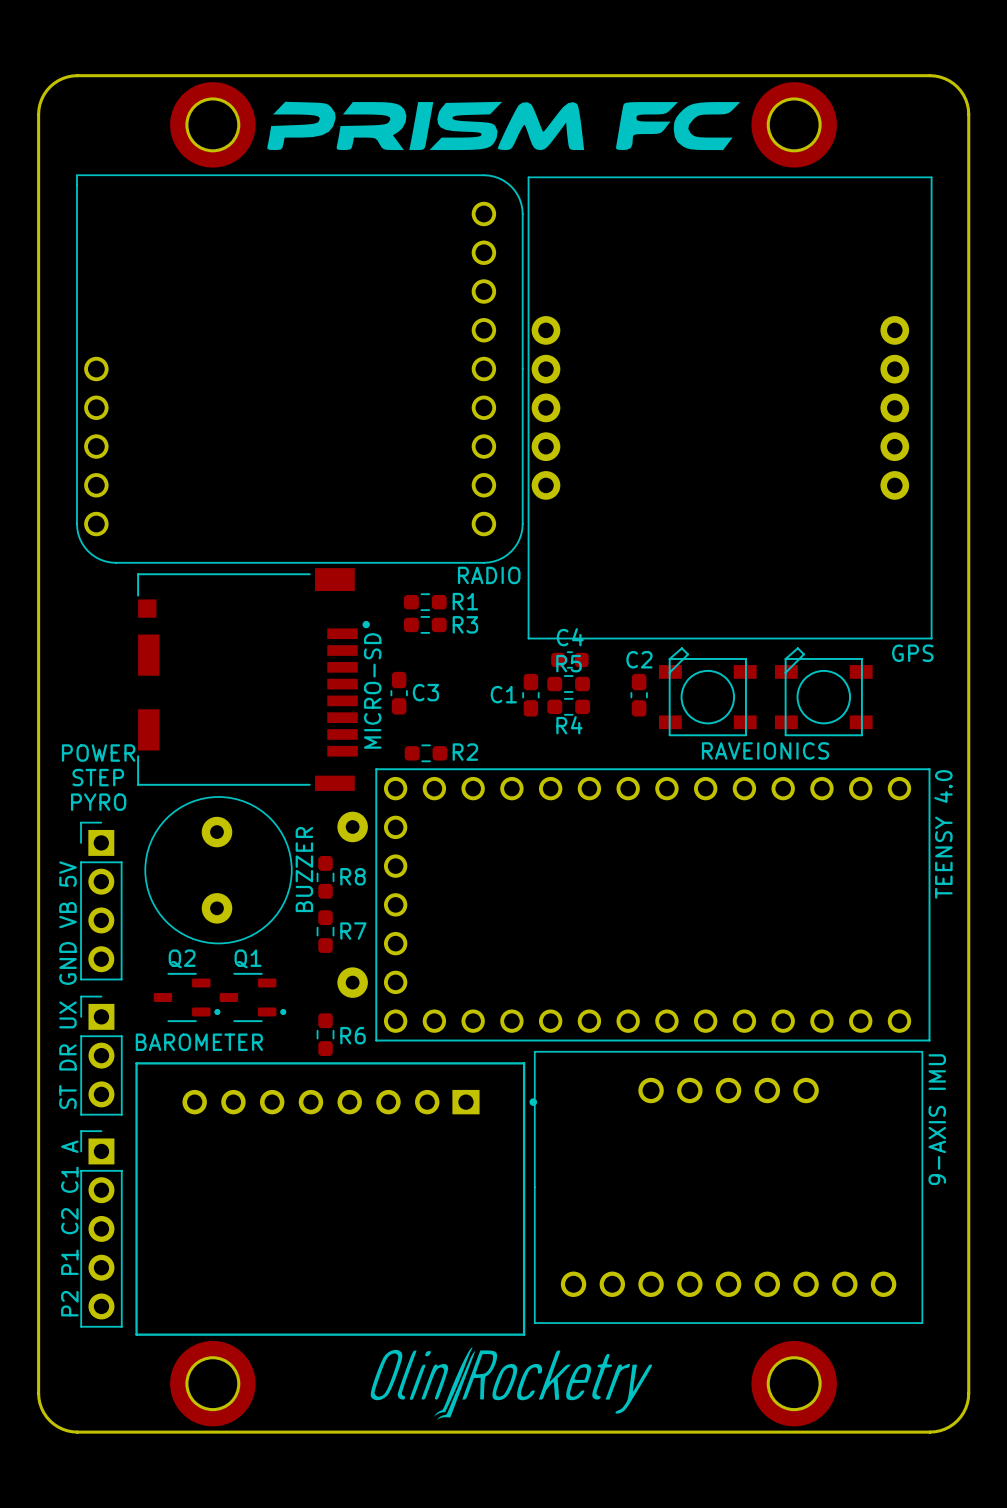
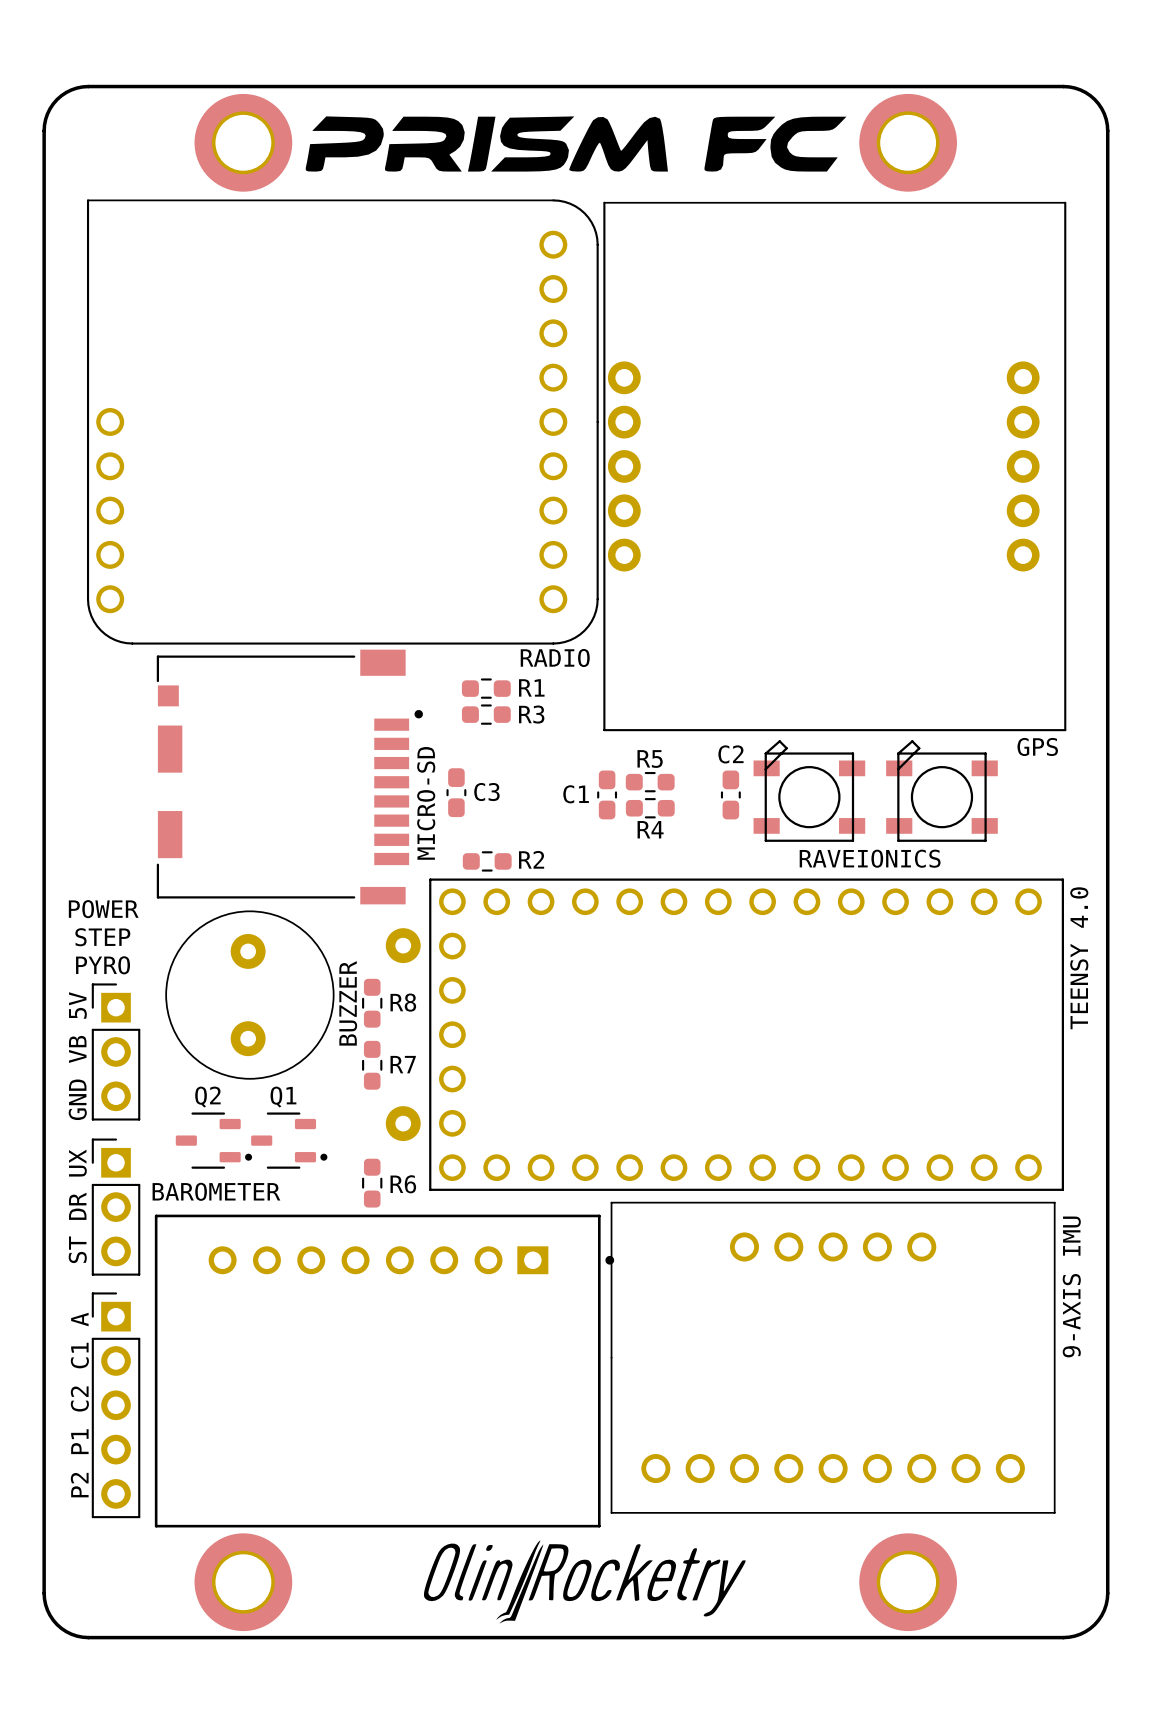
C4: (569, 659) -> none
text position: POWER (98, 753) -> POWER (103, 909)
text position: STEP (98, 777) -> STEP (102, 937)
text position: PYRO (98, 802) -> PYRO (103, 965)
part: (101, 901) -> none
part: none -> (116, 1051)

